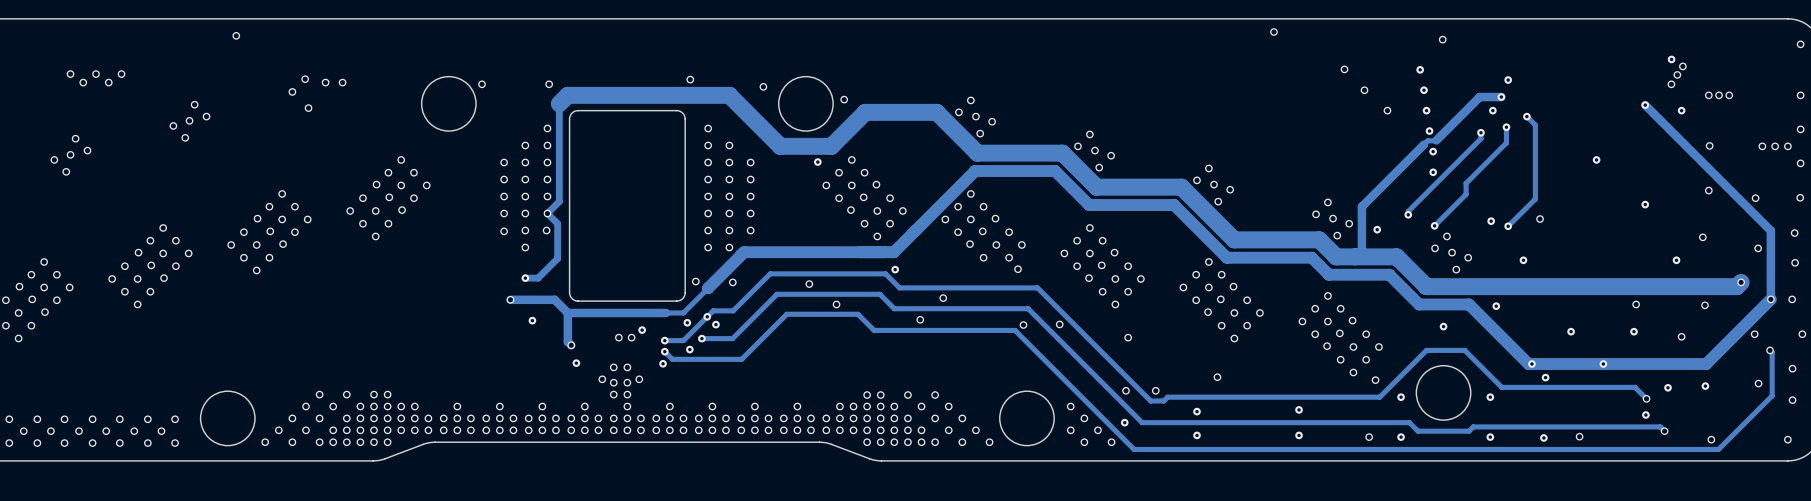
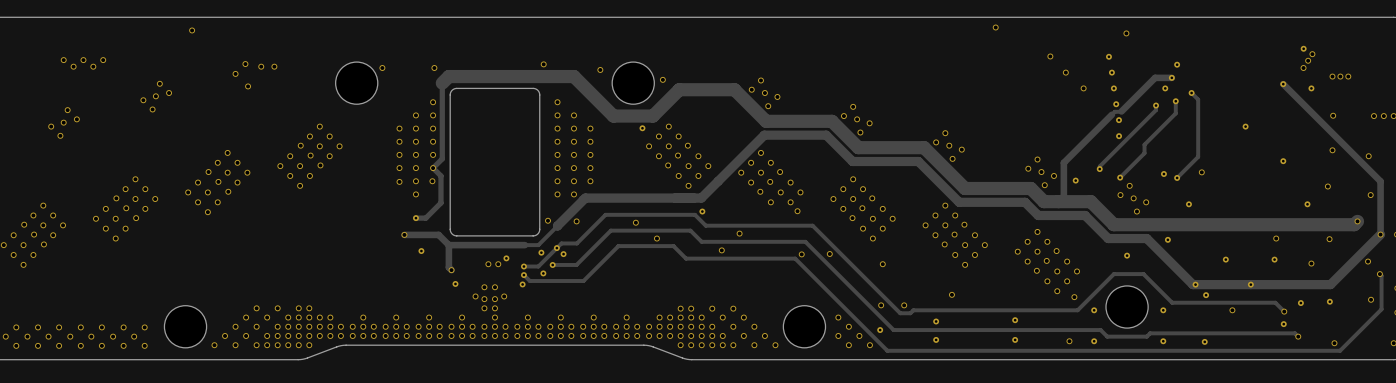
via position: (1579, 436) -> (1232, 310)

